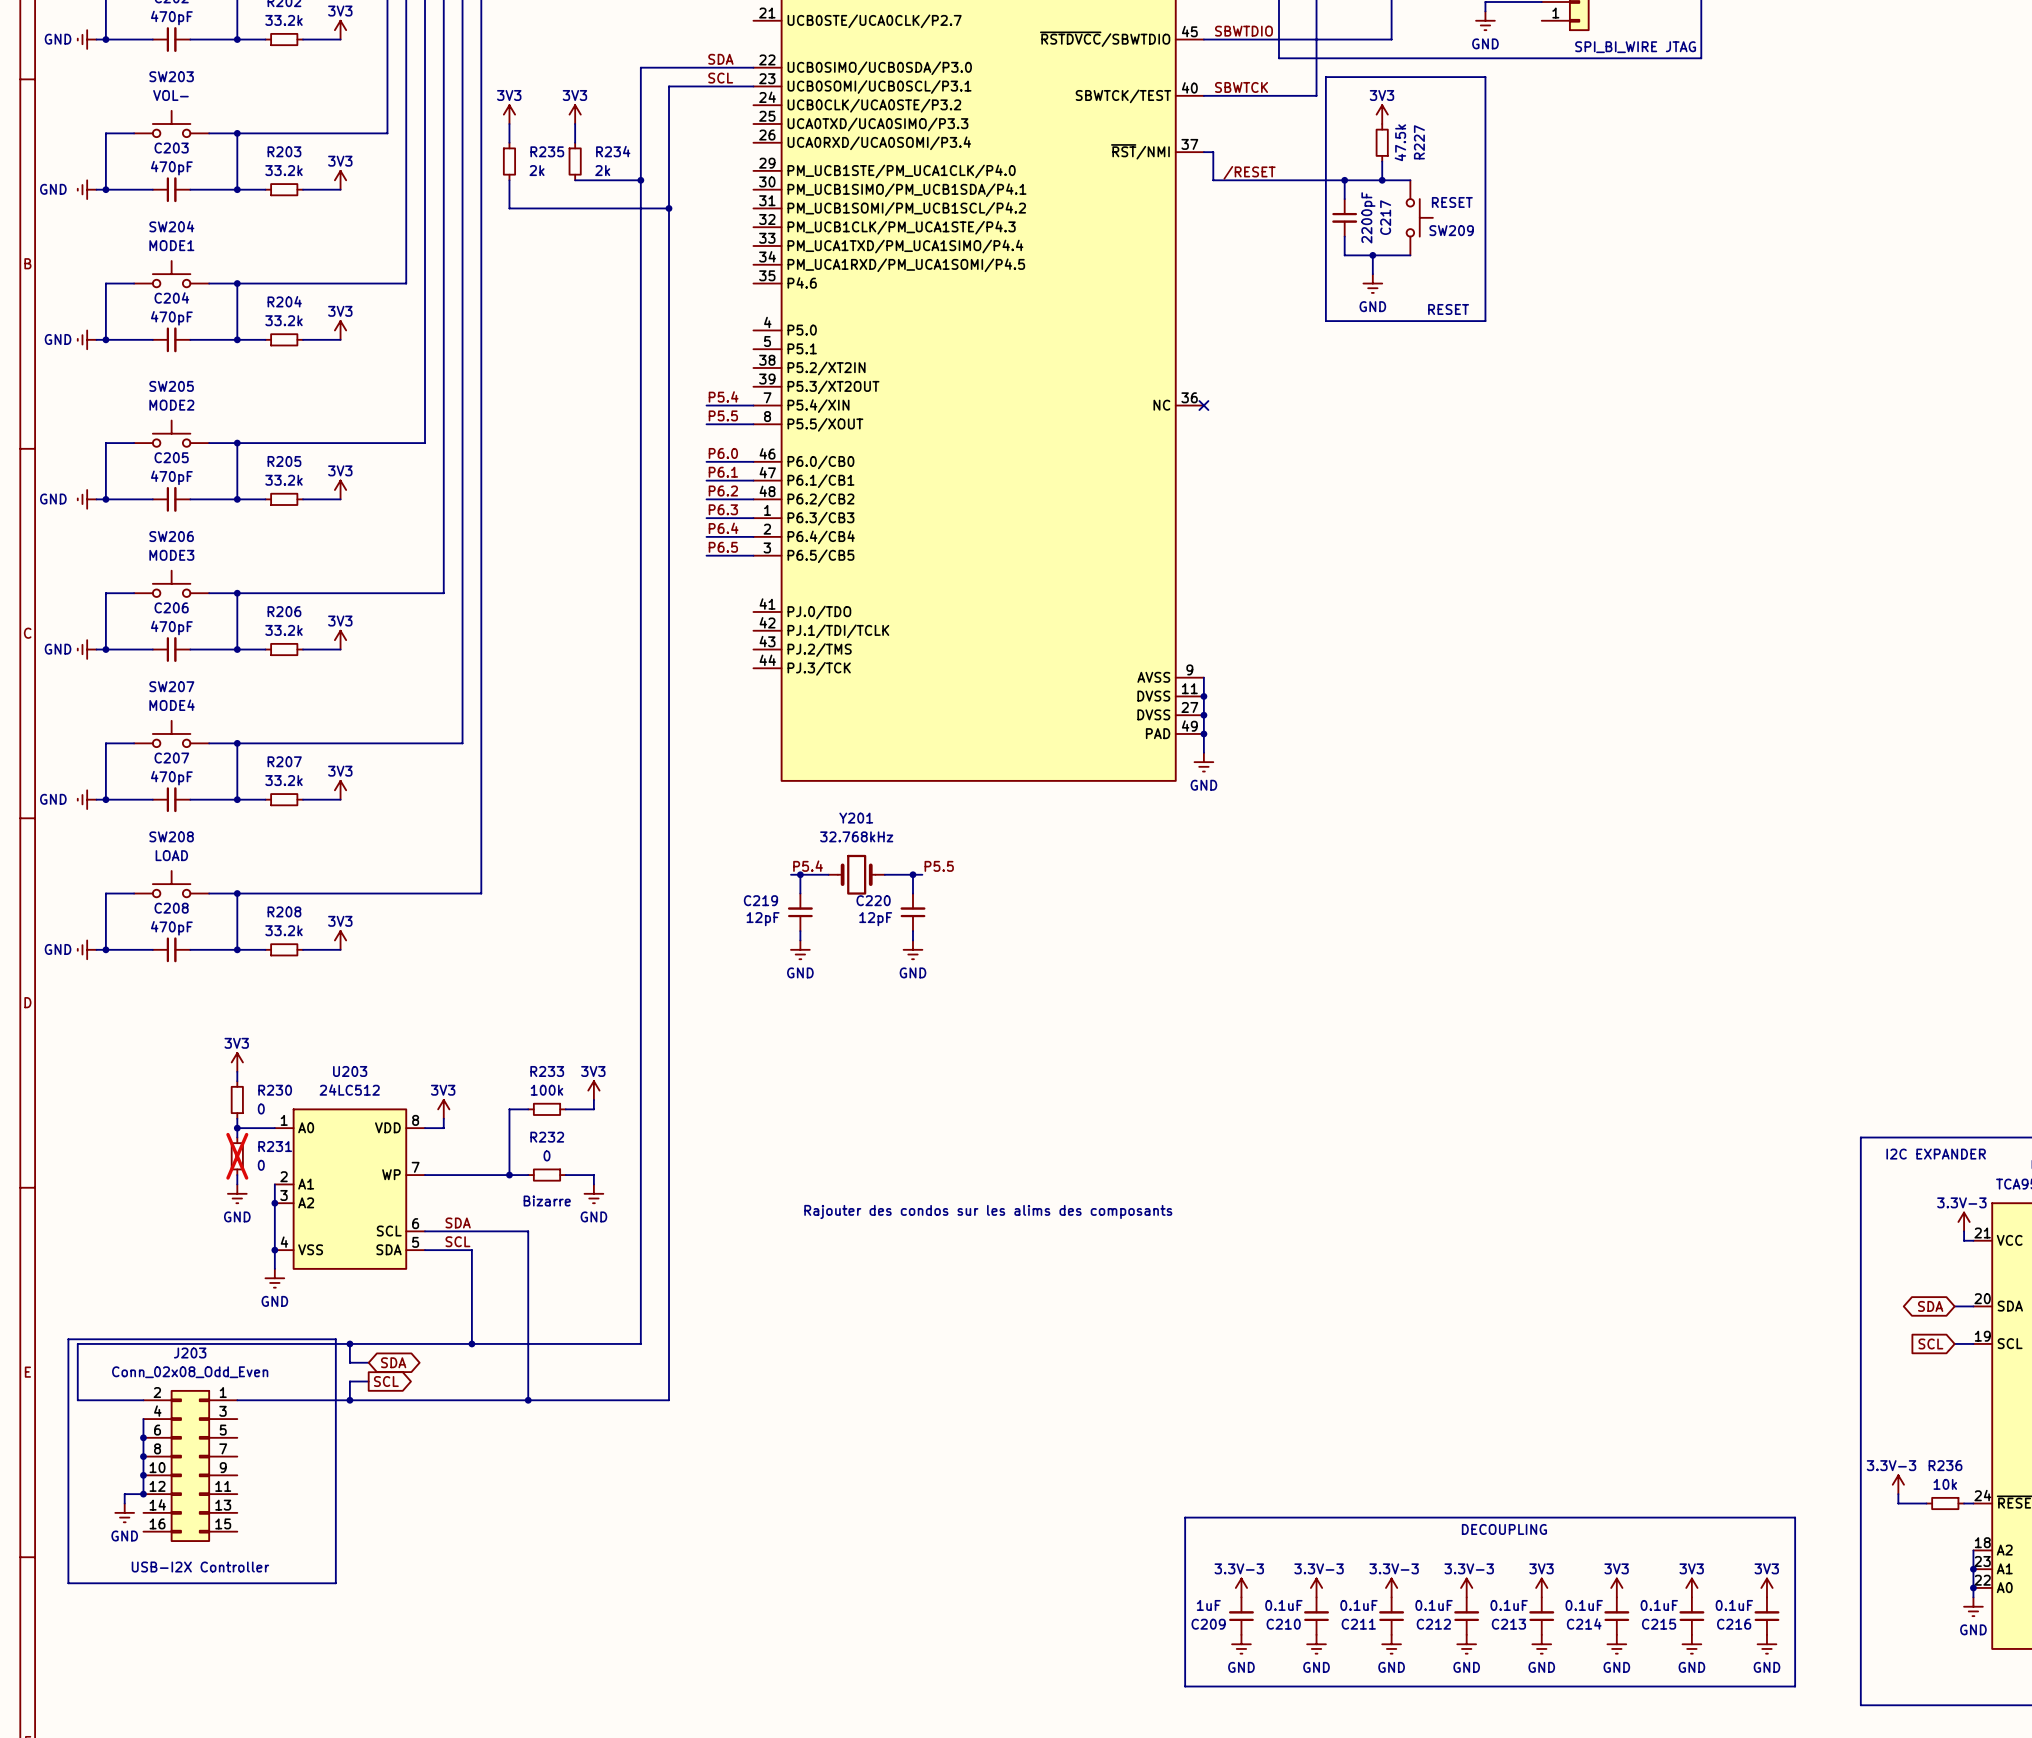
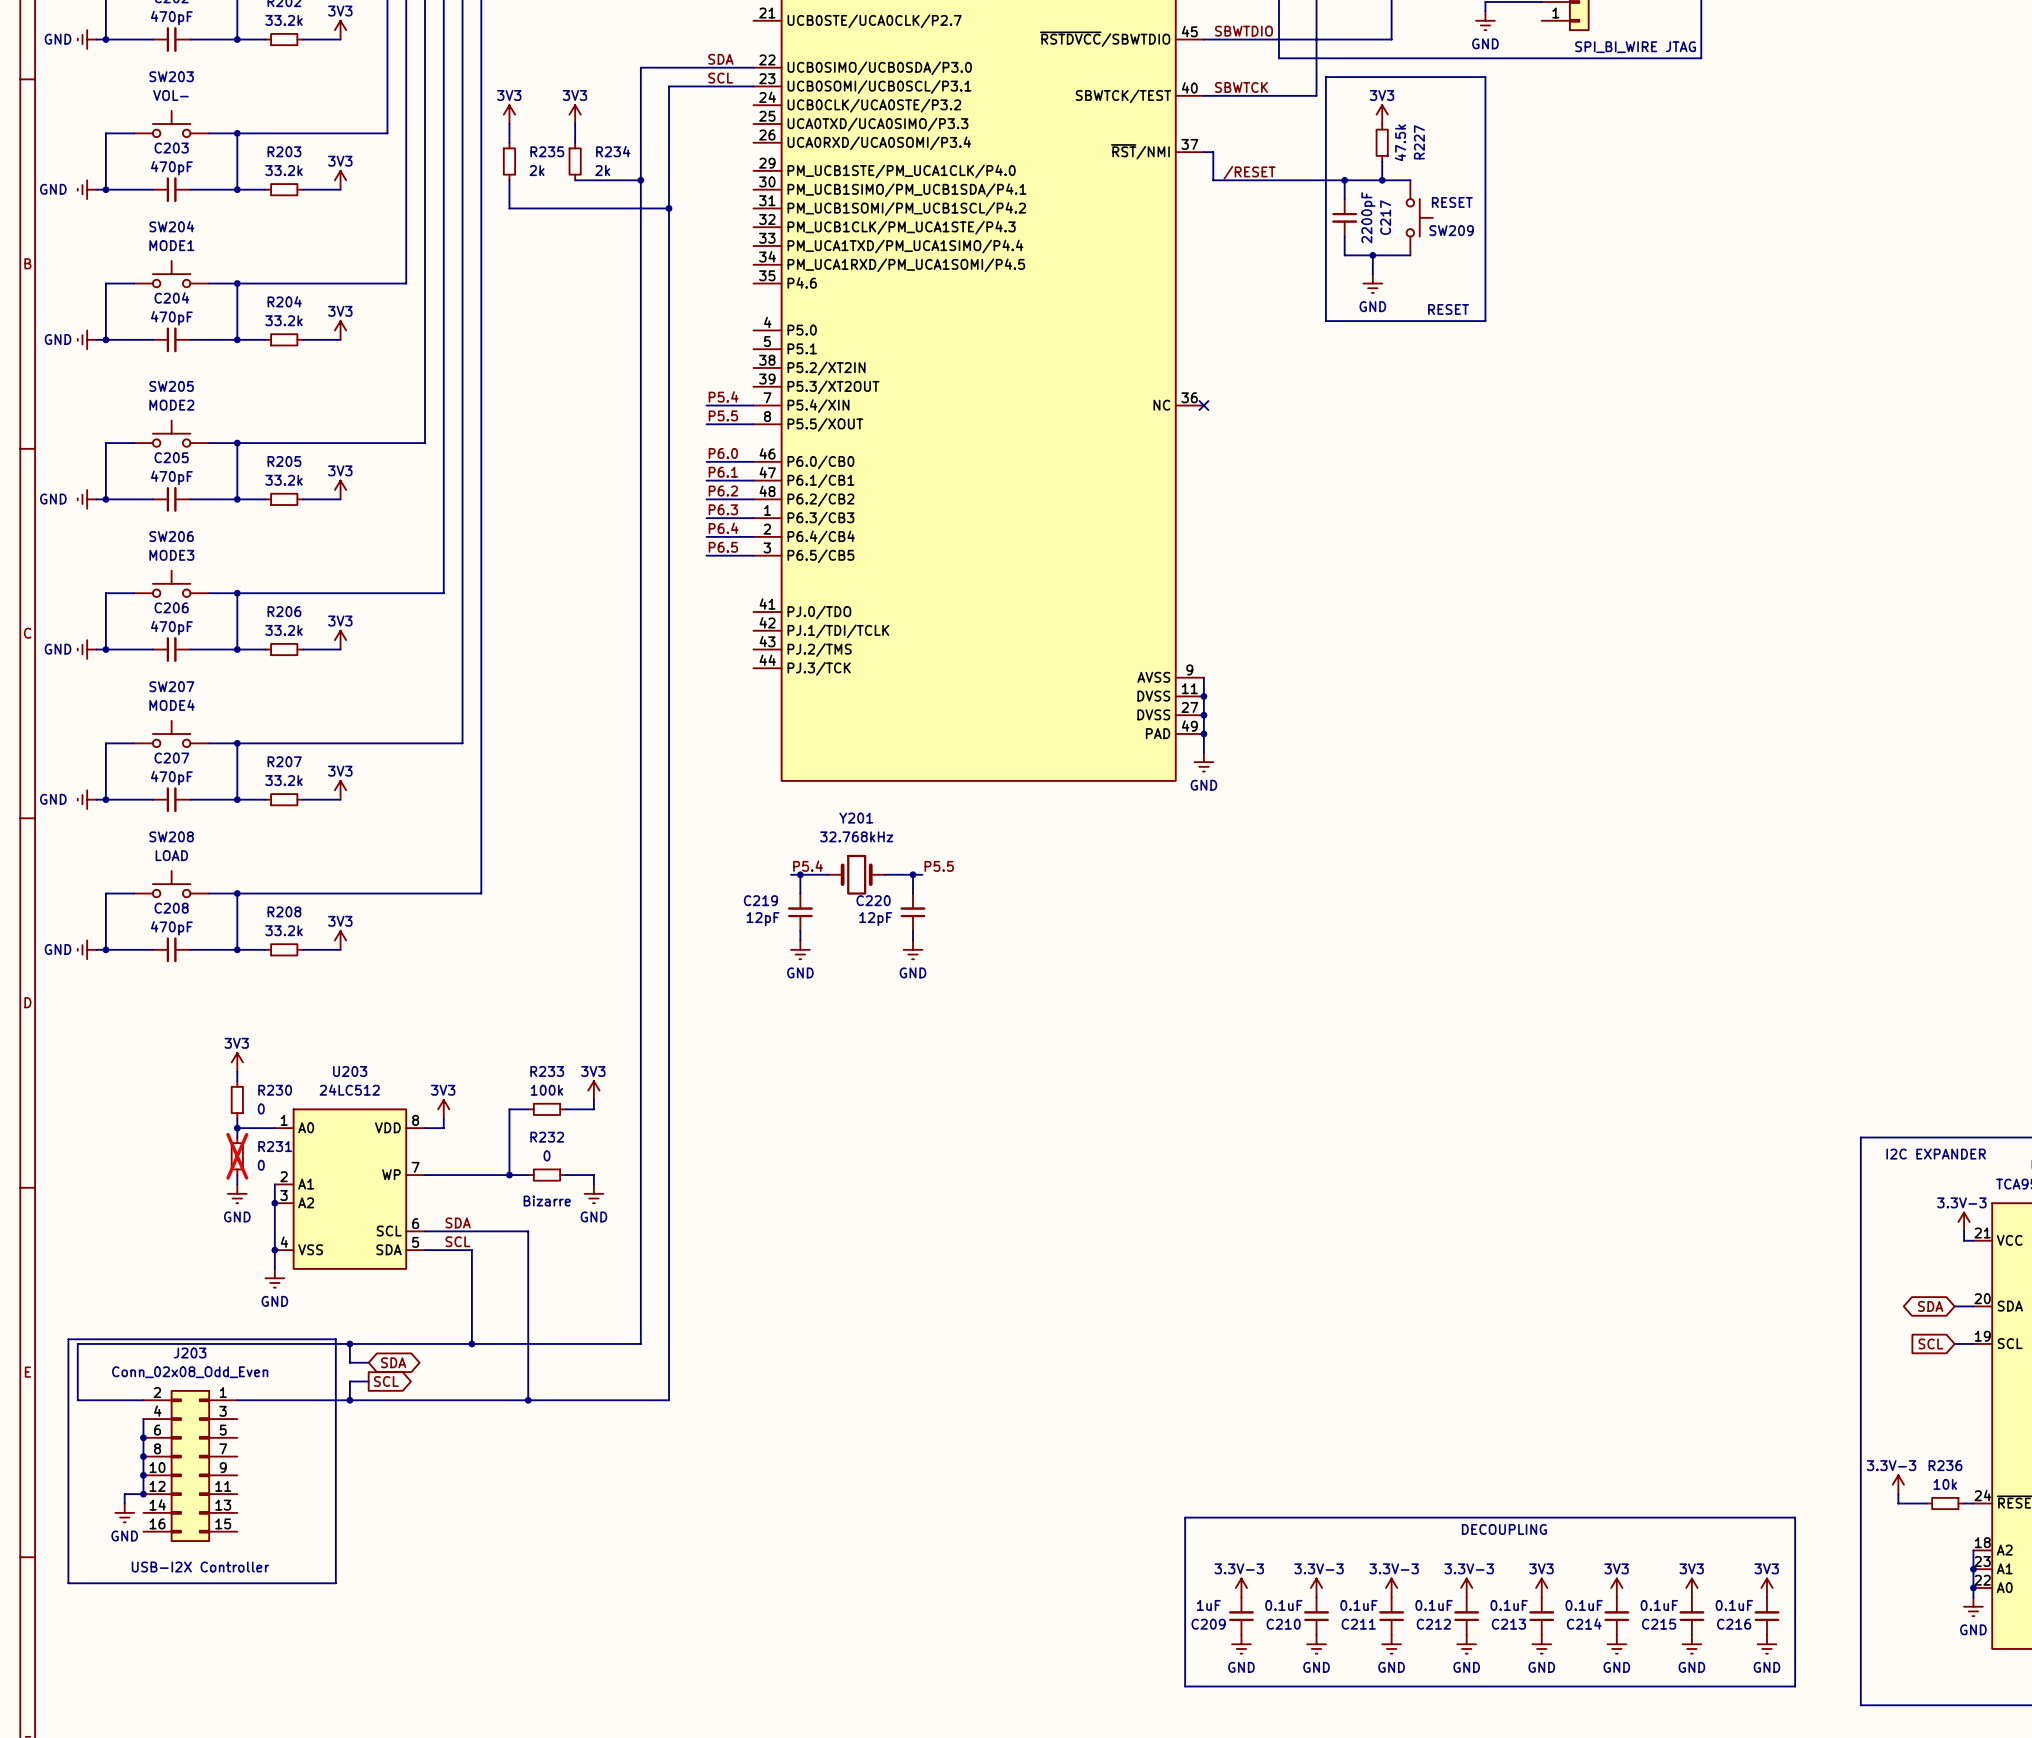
text: Rajouter des condos sur les alims des composants (988, 1211) -> none

